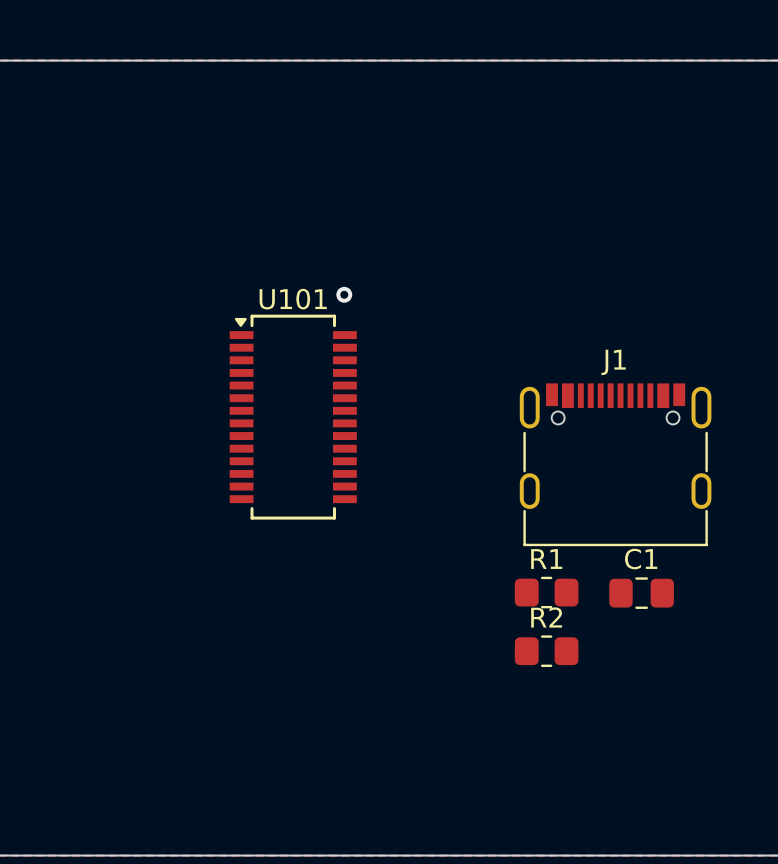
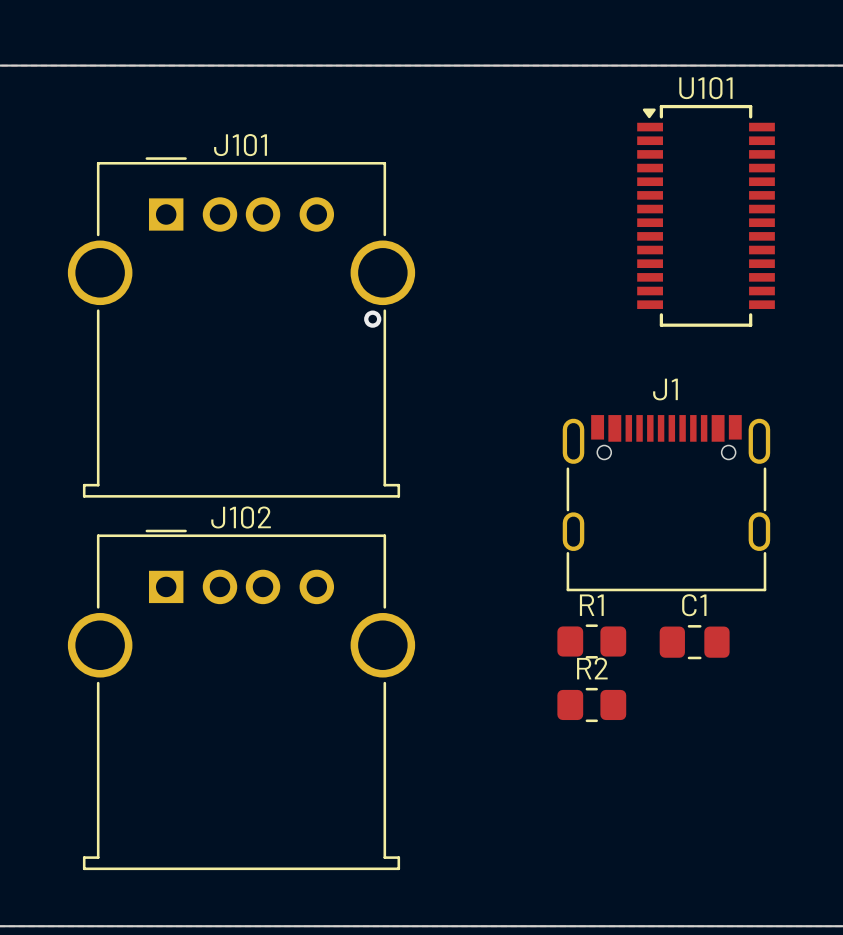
J101: none -> (241, 327)
U101 position: (293, 417) -> (706, 215)
J102: none -> (241, 699)

